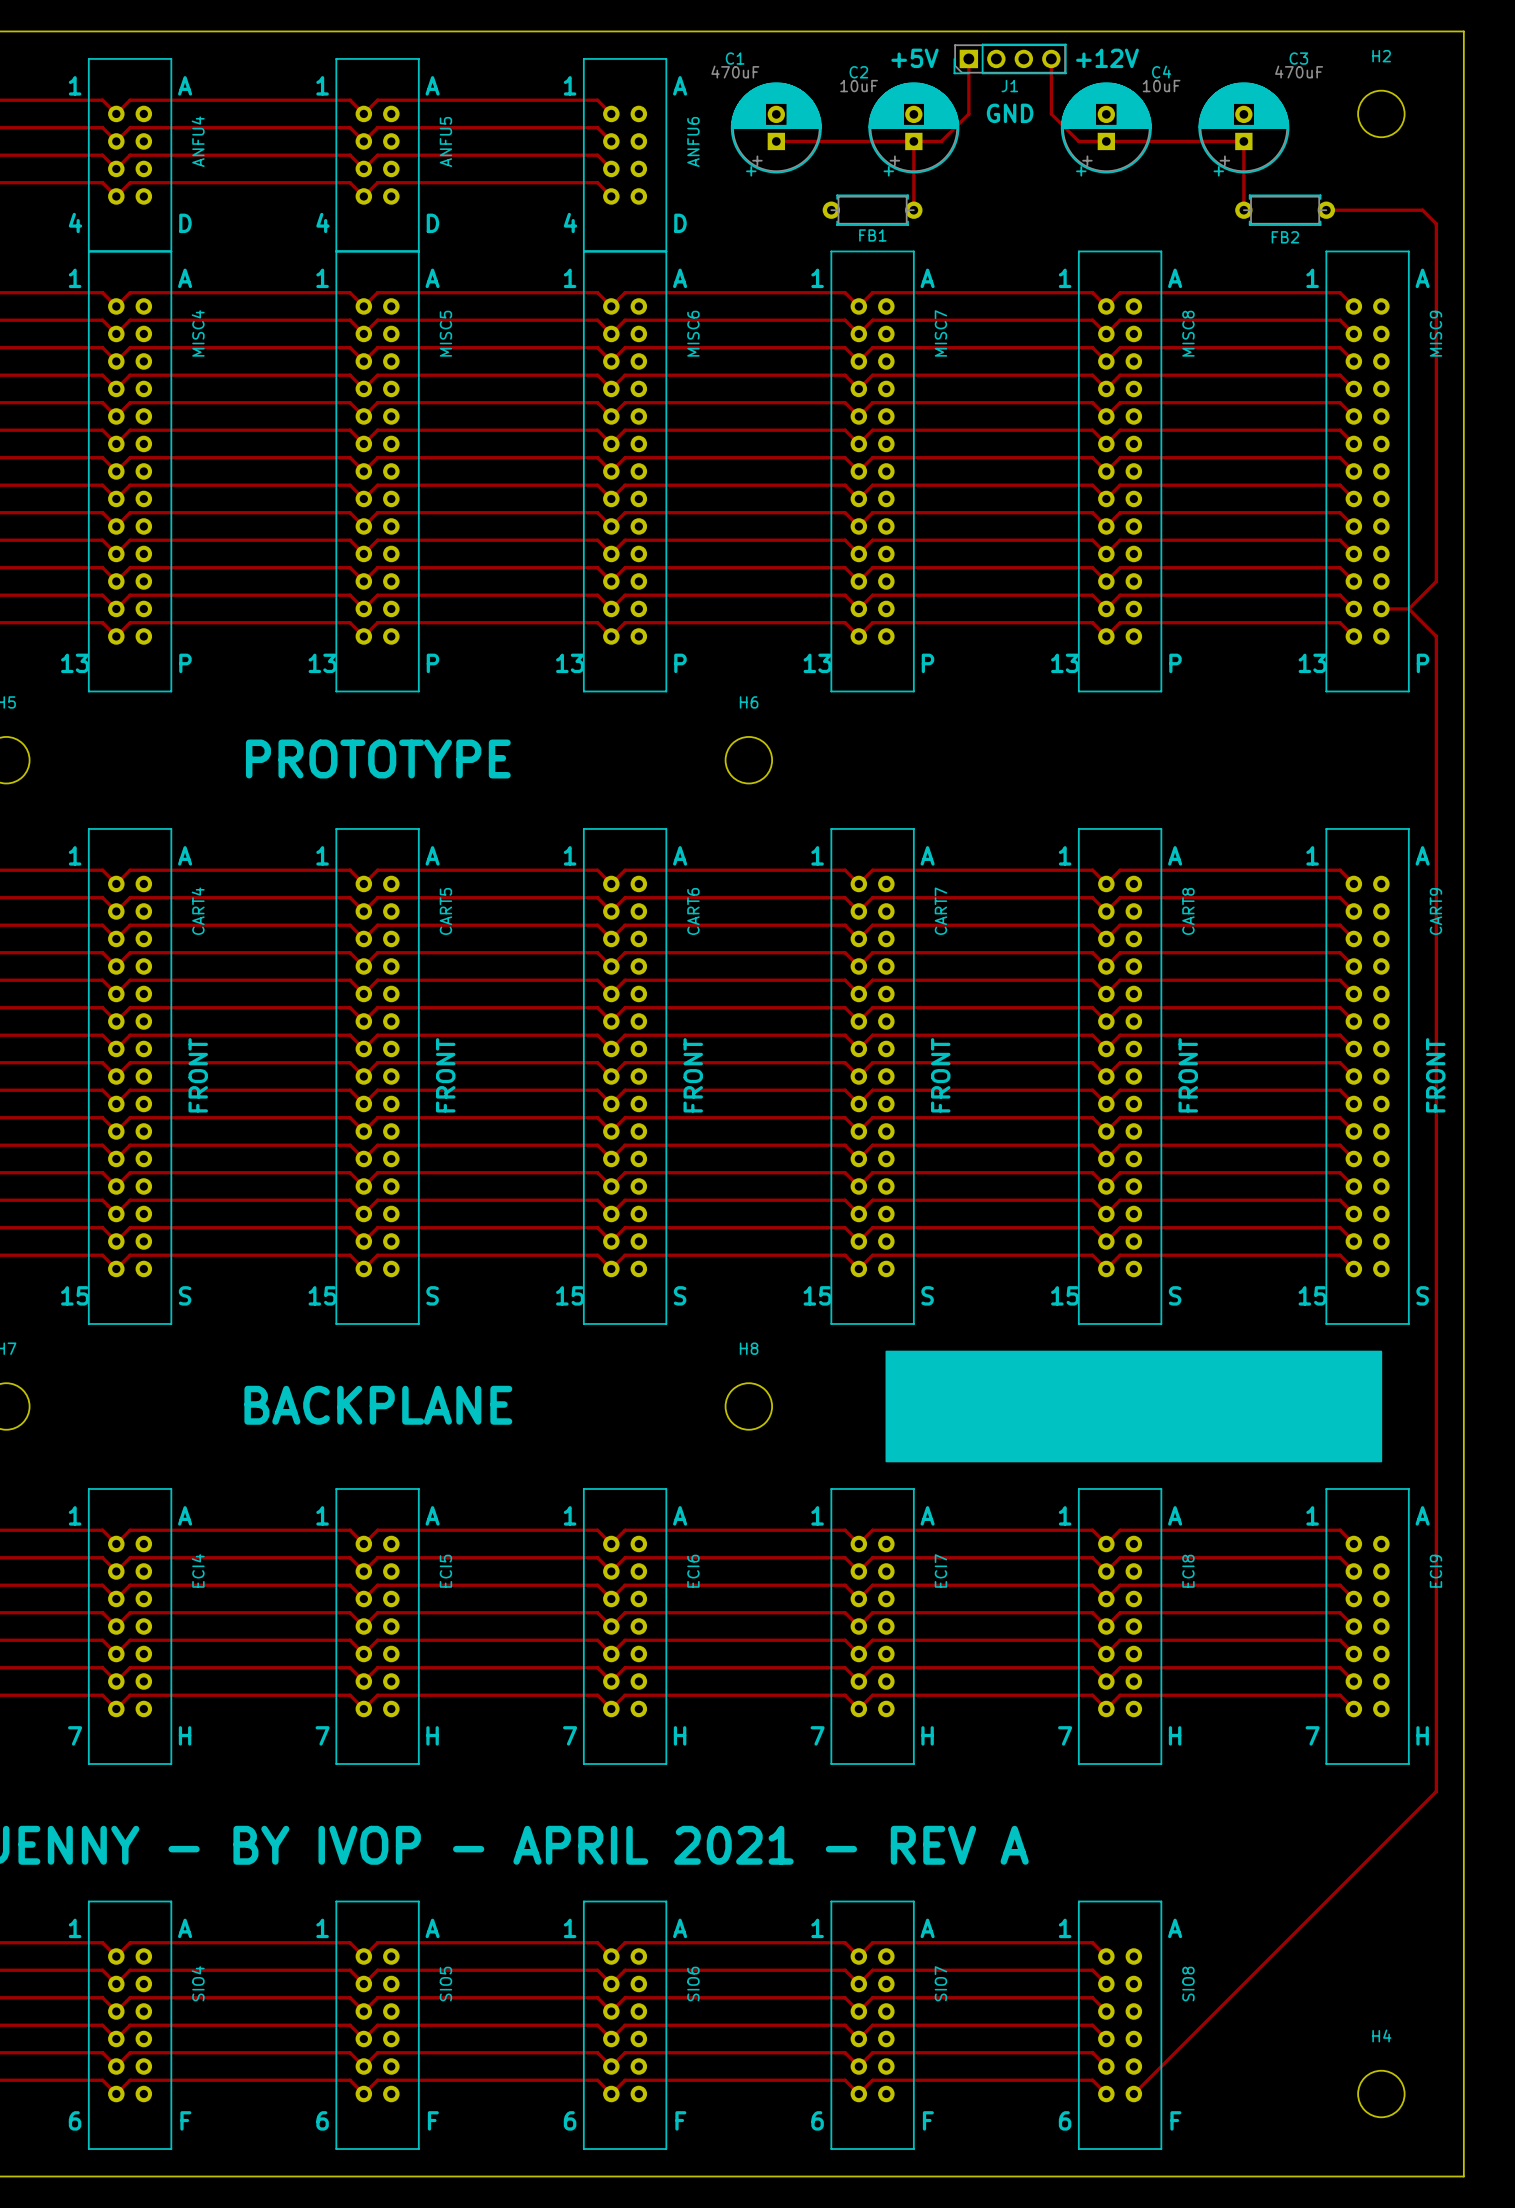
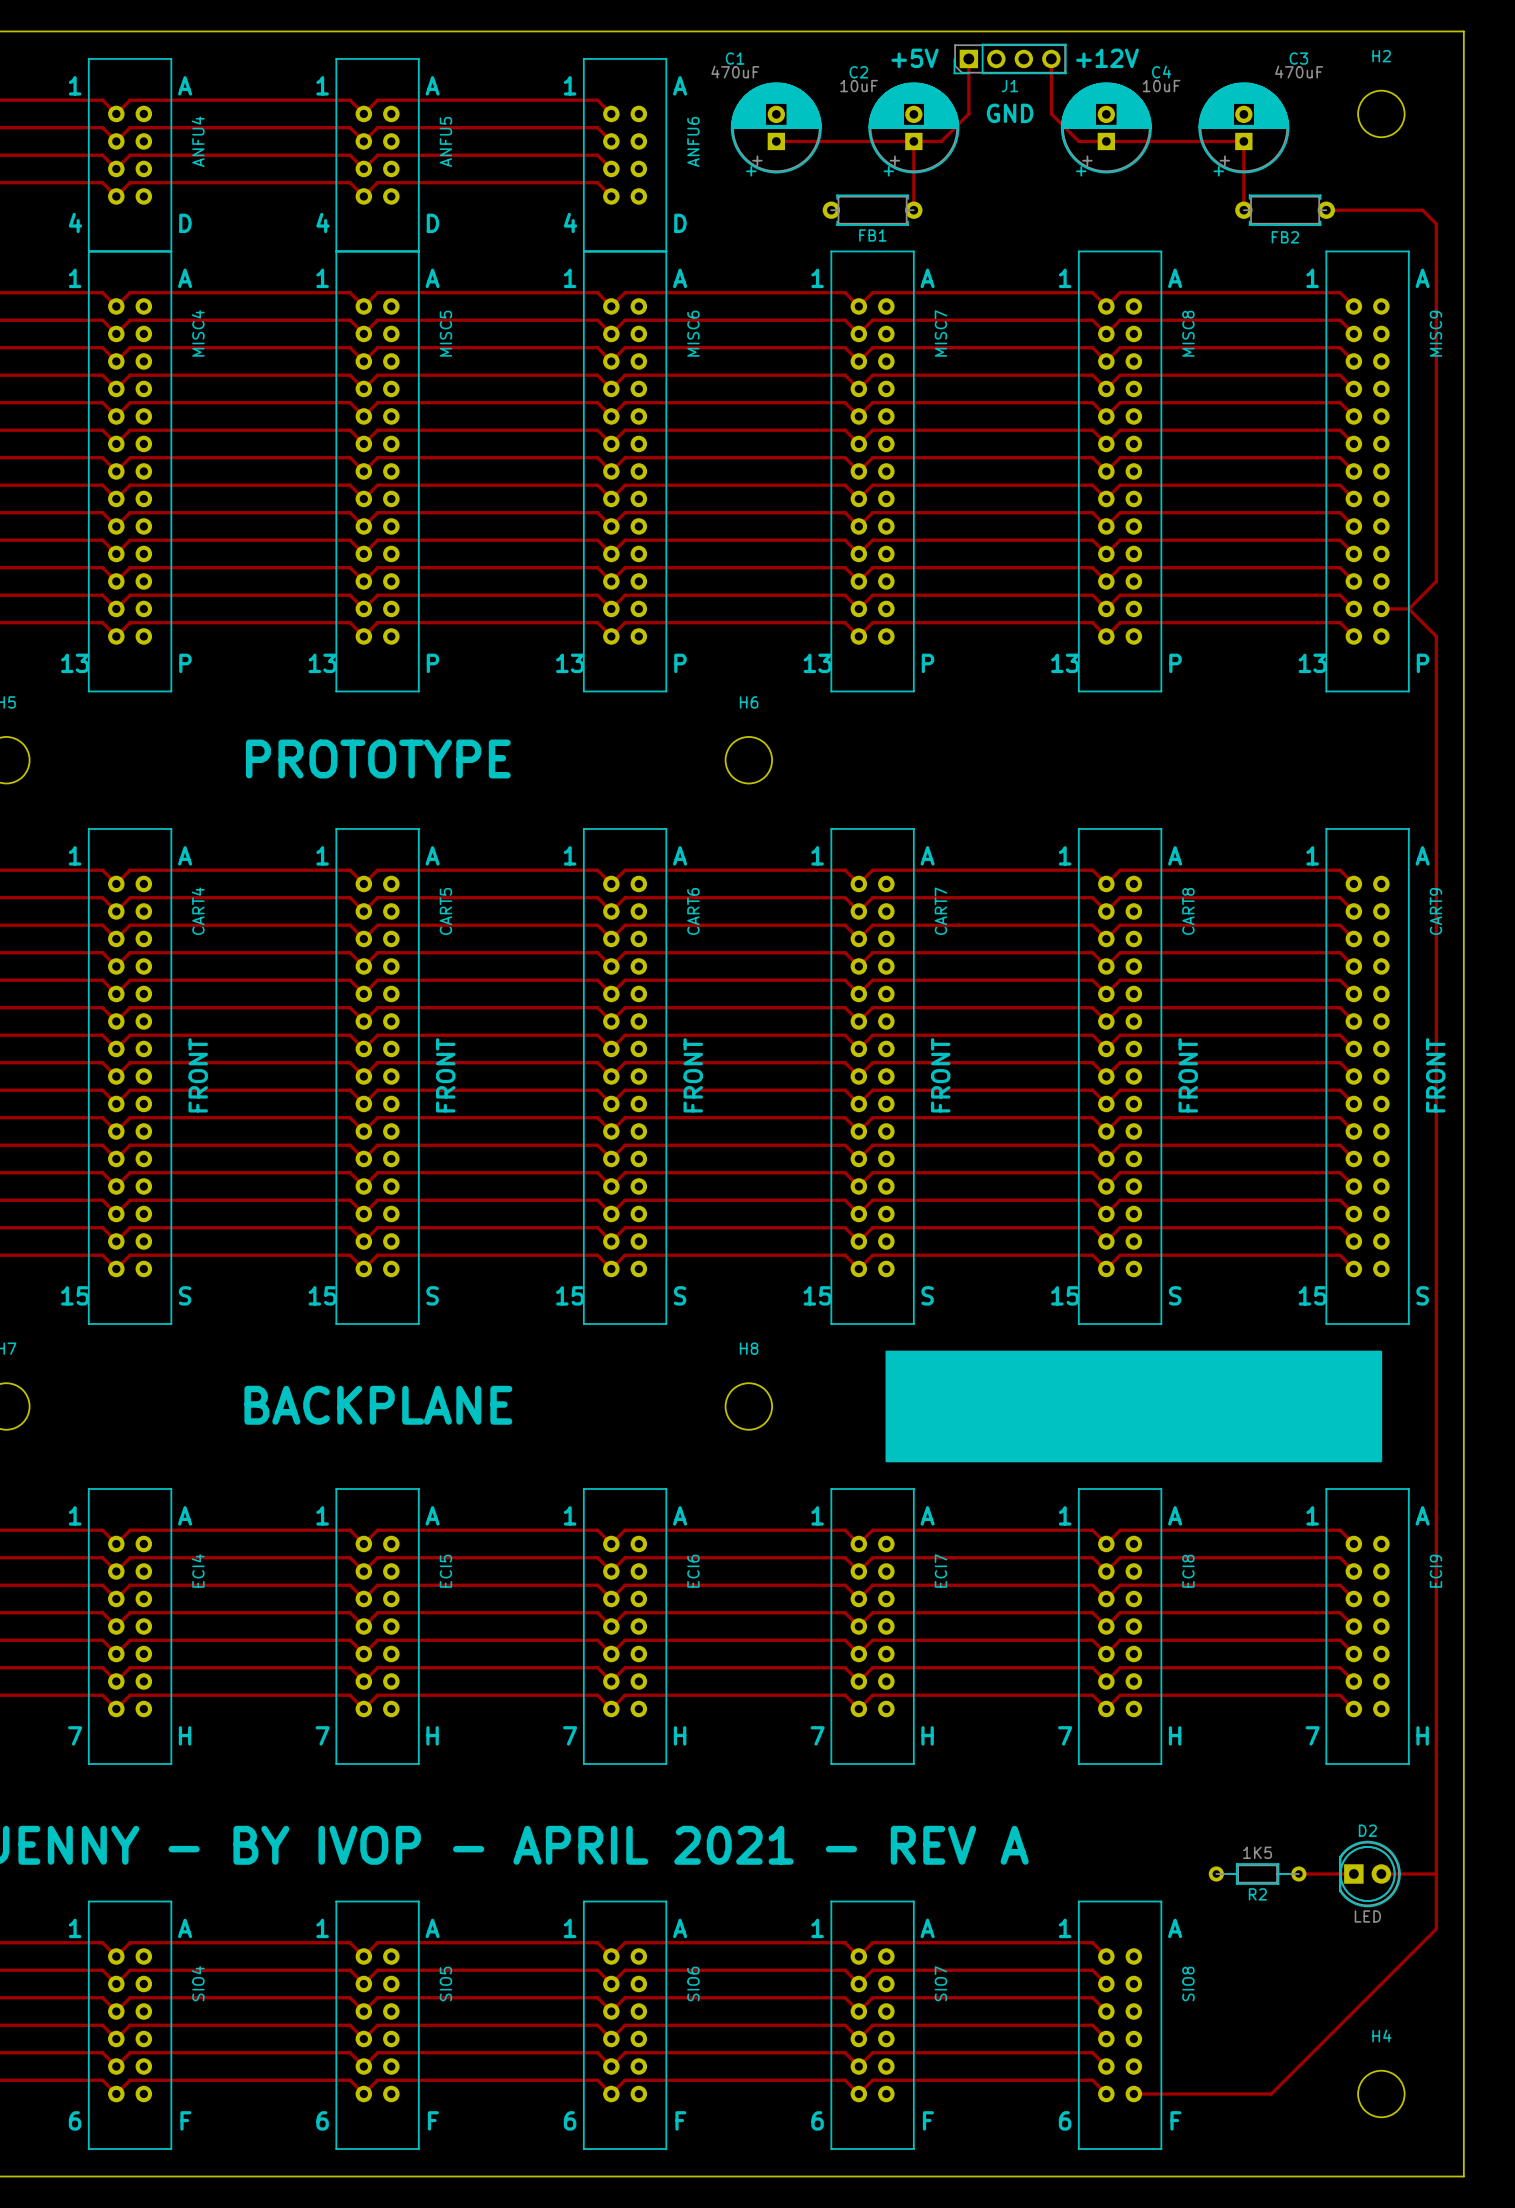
track: (1436, 1791) (1133, 2094) -> (1436, 1791) (1436, 1929) (1271, 2094) (1133, 2094)
R2: none -> 1K5 (1257, 1874)
track: none -> (1298, 1874) (1353, 1874)
D2: none -> LED (1369, 1874)
track: none -> (1381, 1874) (1436, 1874)

